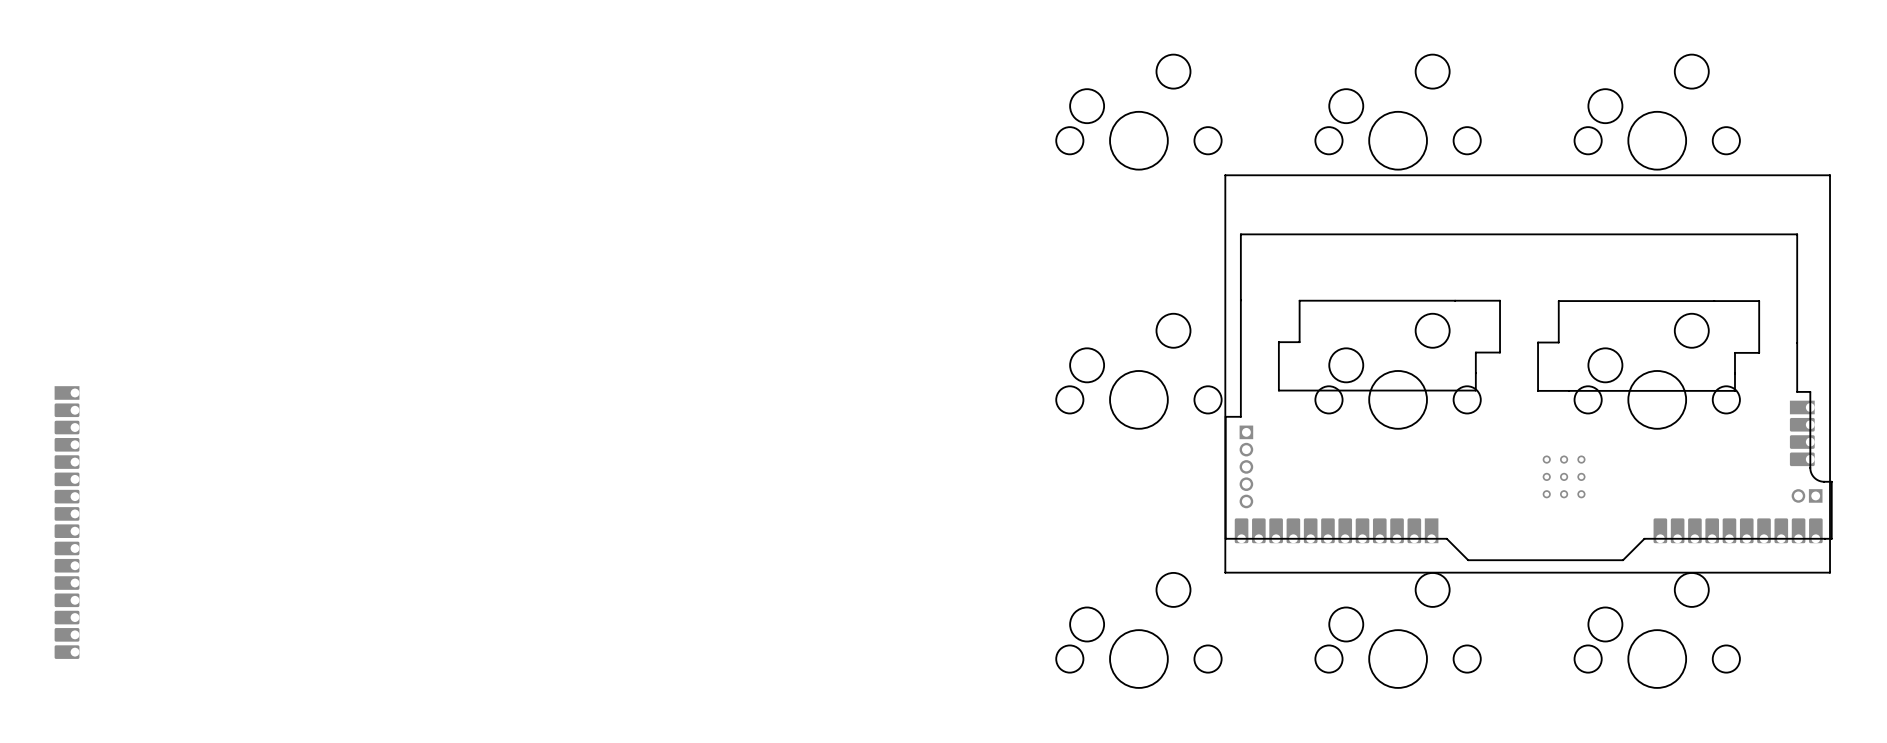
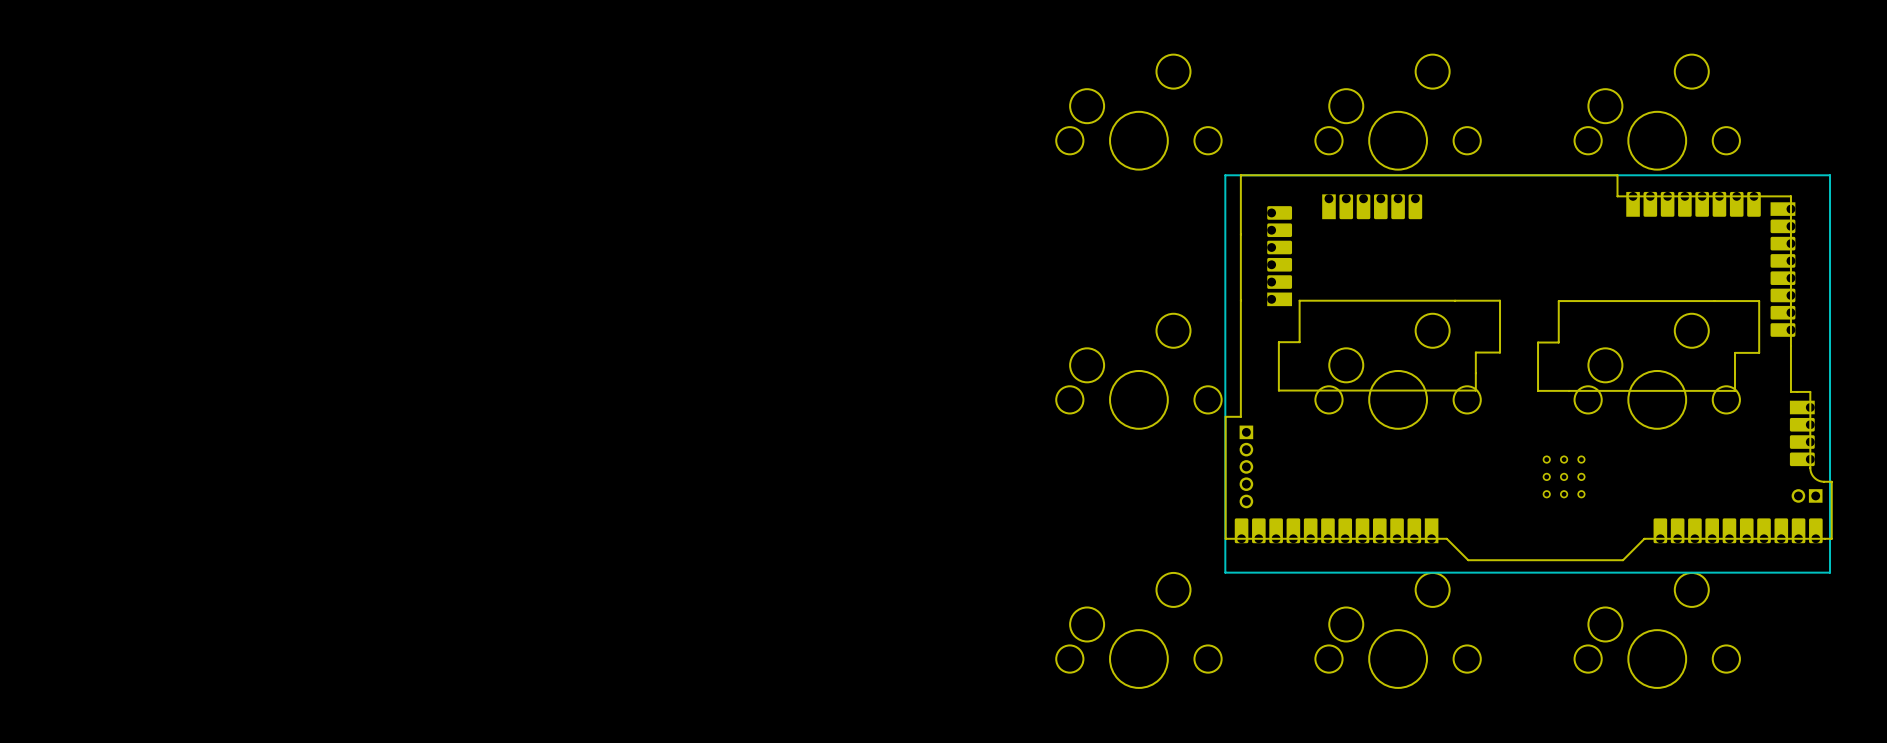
part: none -> (1693, 204)
part: none -> (1372, 206)
board edge: (1240, 234) (1797, 234) (1797, 391) -> (1240, 234) (1240, 175) (1617, 175) (1617, 196) (1790, 196) (1790, 391) (1797, 391)
part: none -> (1279, 256)
part: none -> (1782, 269)
part: (67, 522) -> none

